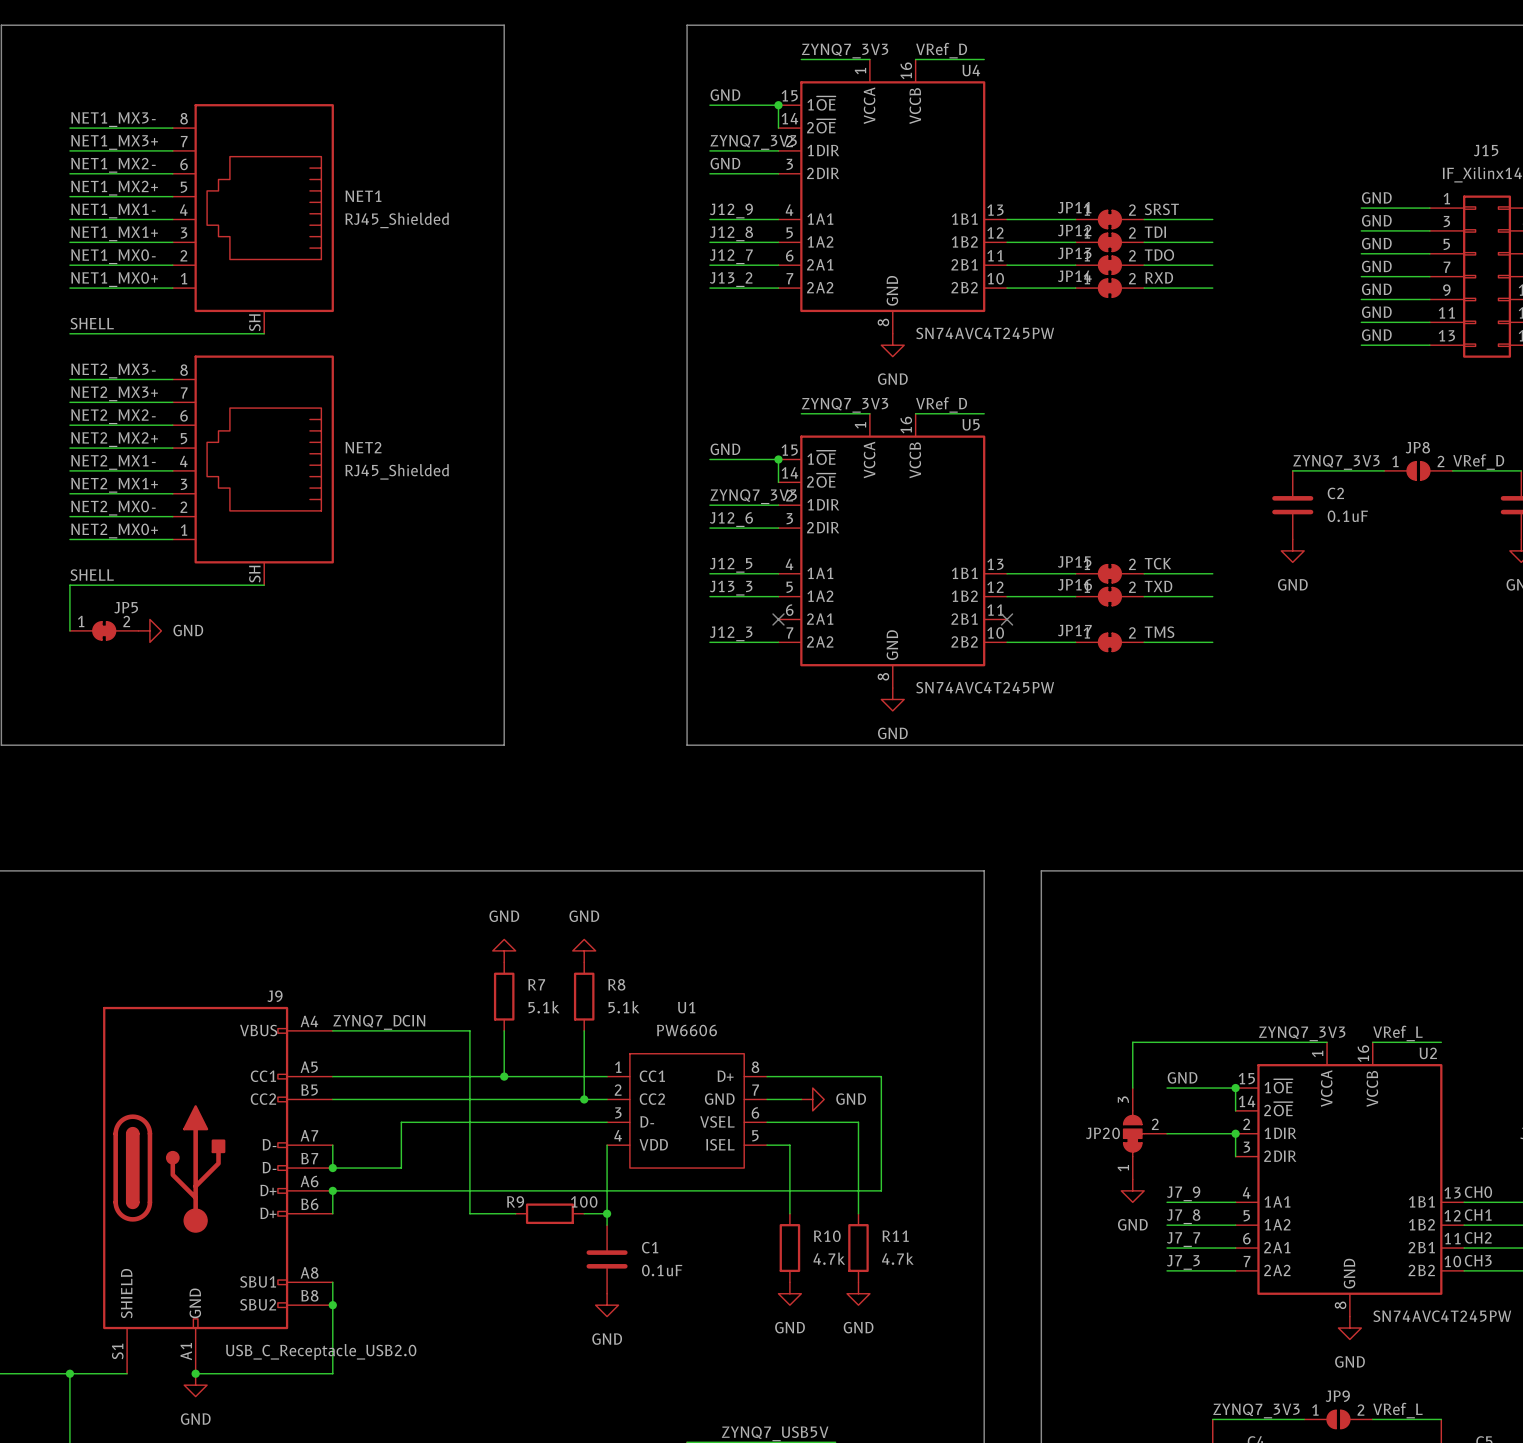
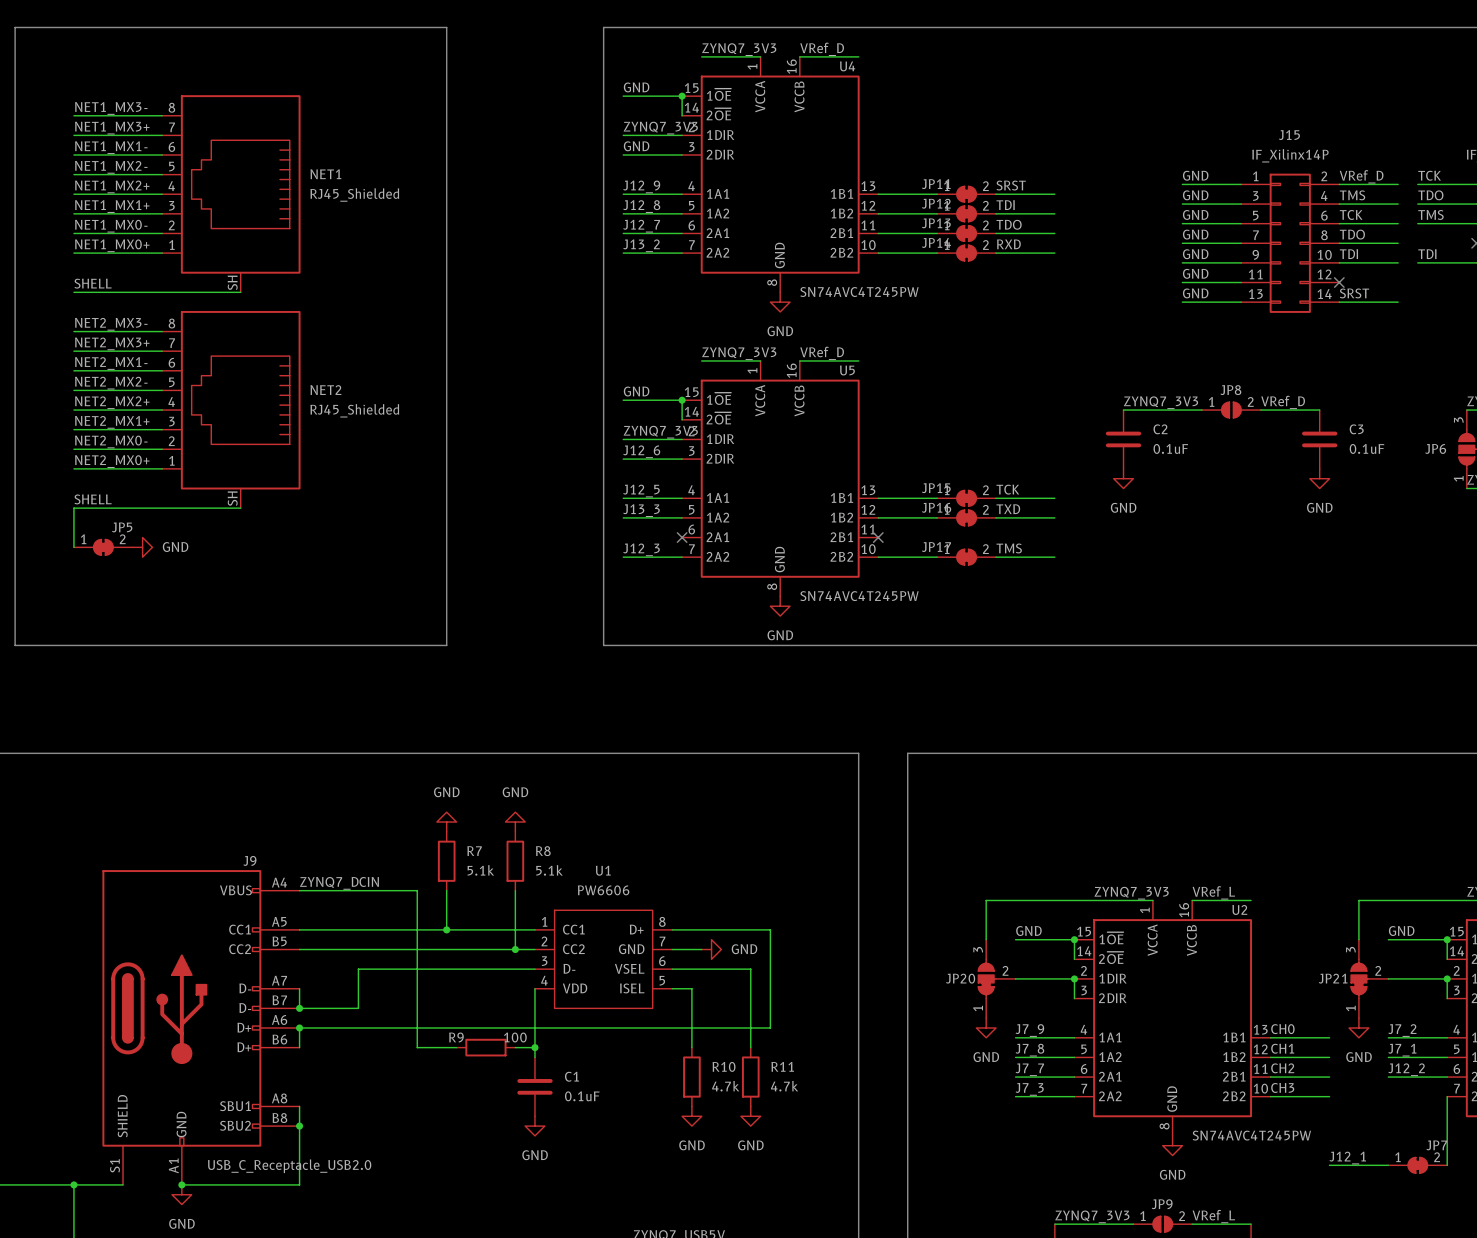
label: NET1_MX2- (113, 165) -> NET1_MX1- (111, 147)
label: NET1_MX2+ (114, 188) -> NET1_MX2- (111, 167)
label: NET1_MX1- (113, 211) -> NET1_MX2+ (112, 186)
label: NET2_MX2- (113, 416) -> NET2_MX1- (111, 363)
label: NET2_MX2+ (114, 439) -> NET2_MX2- (111, 383)
label: NET2_MX1- (113, 462) -> NET2_MX2+ (112, 402)

